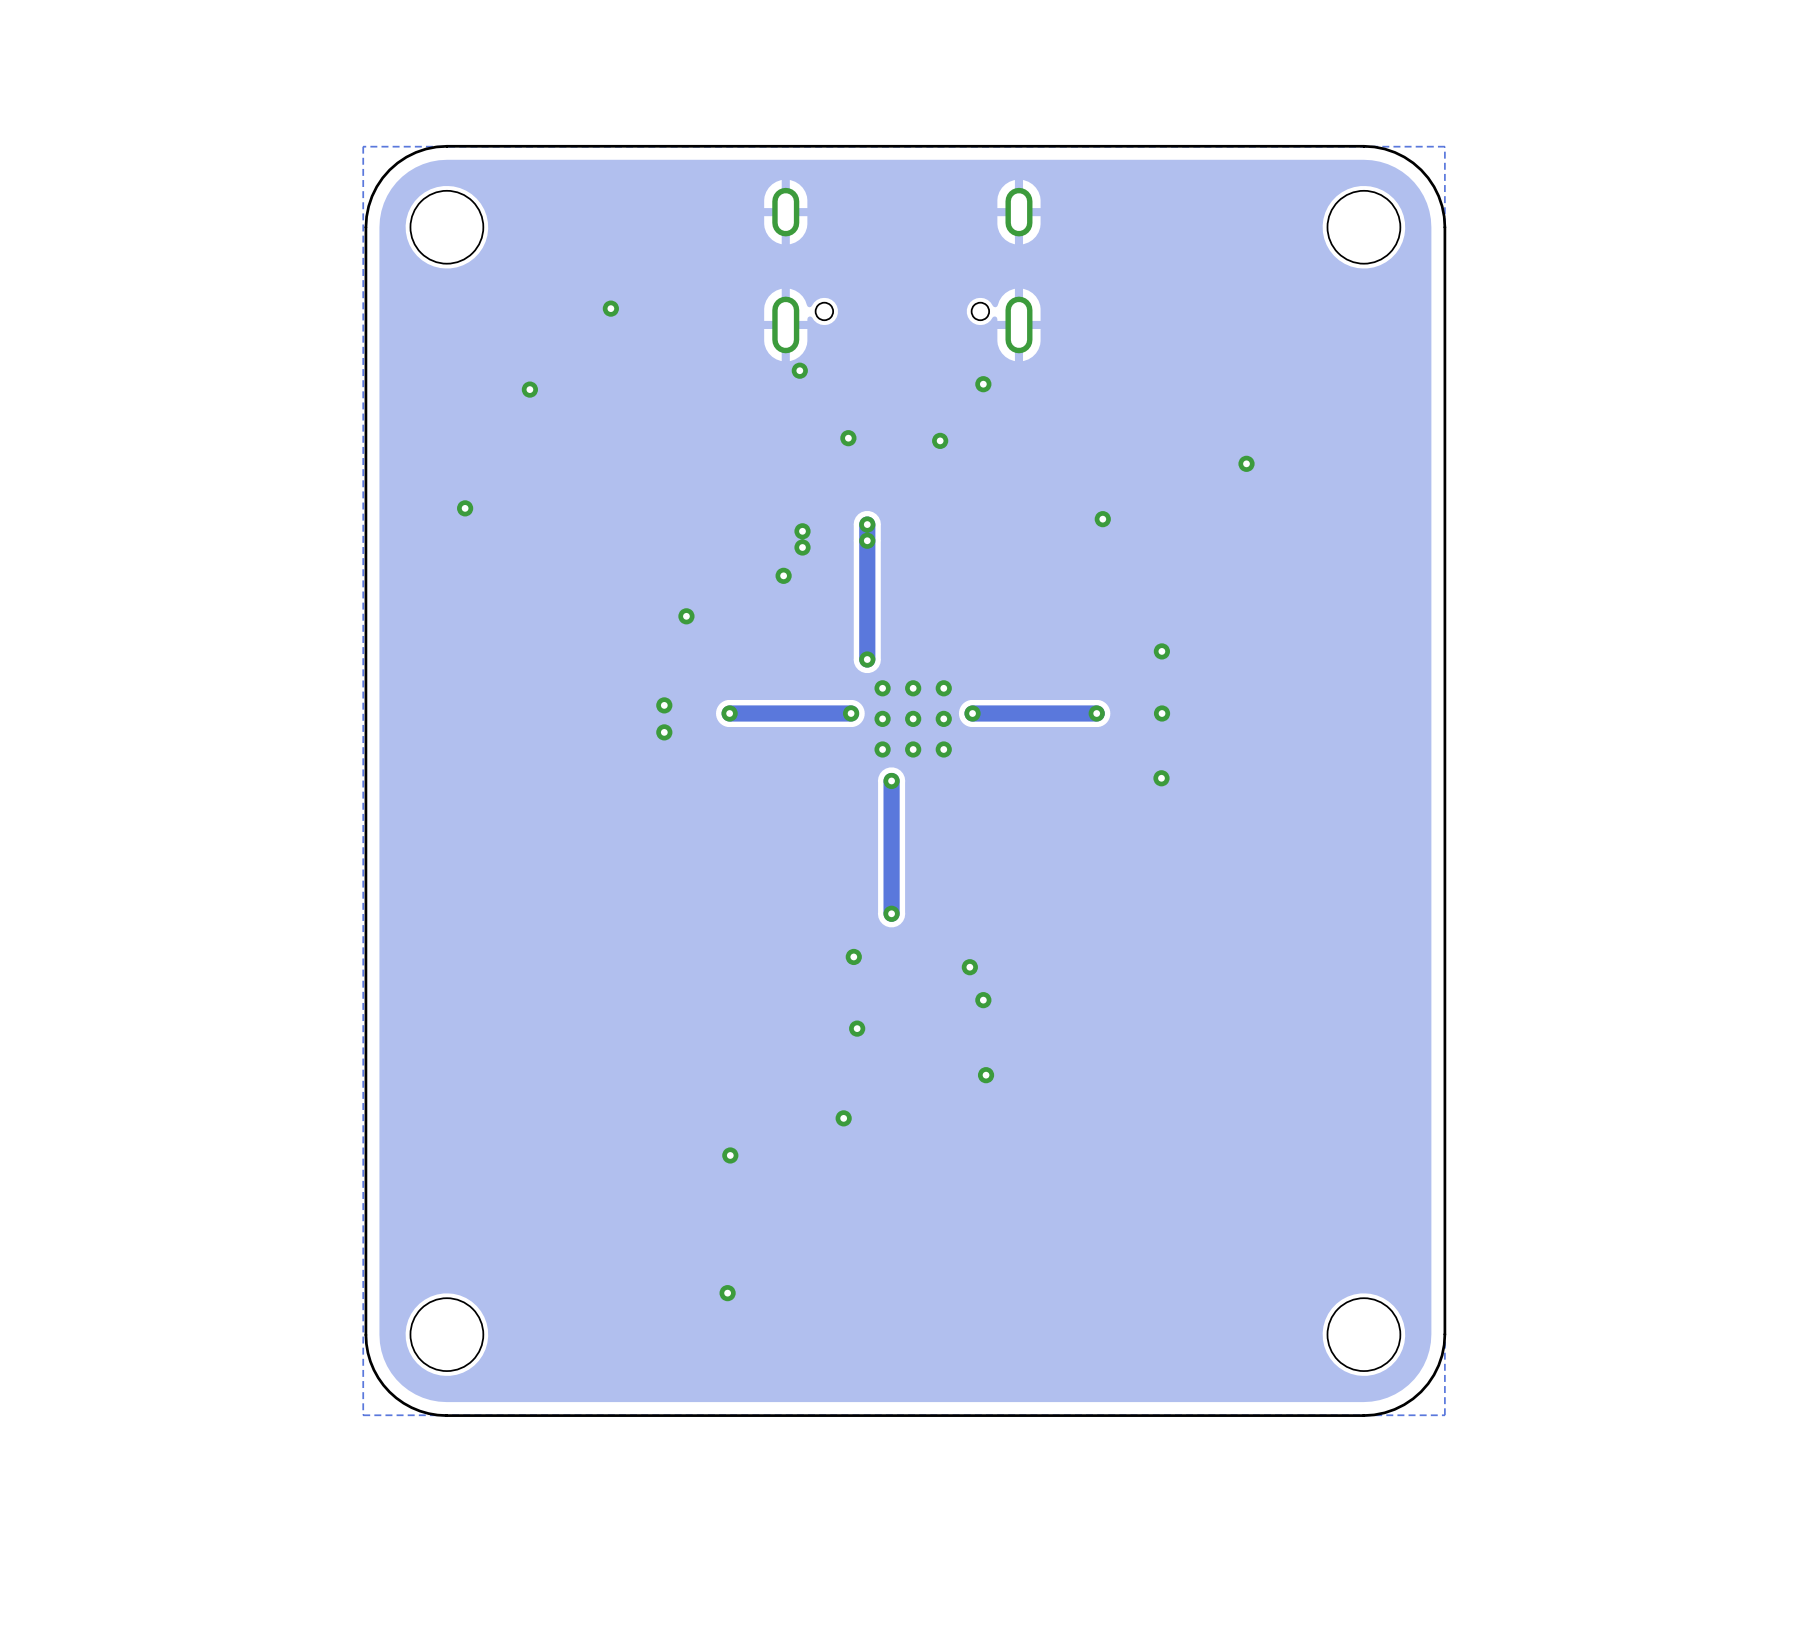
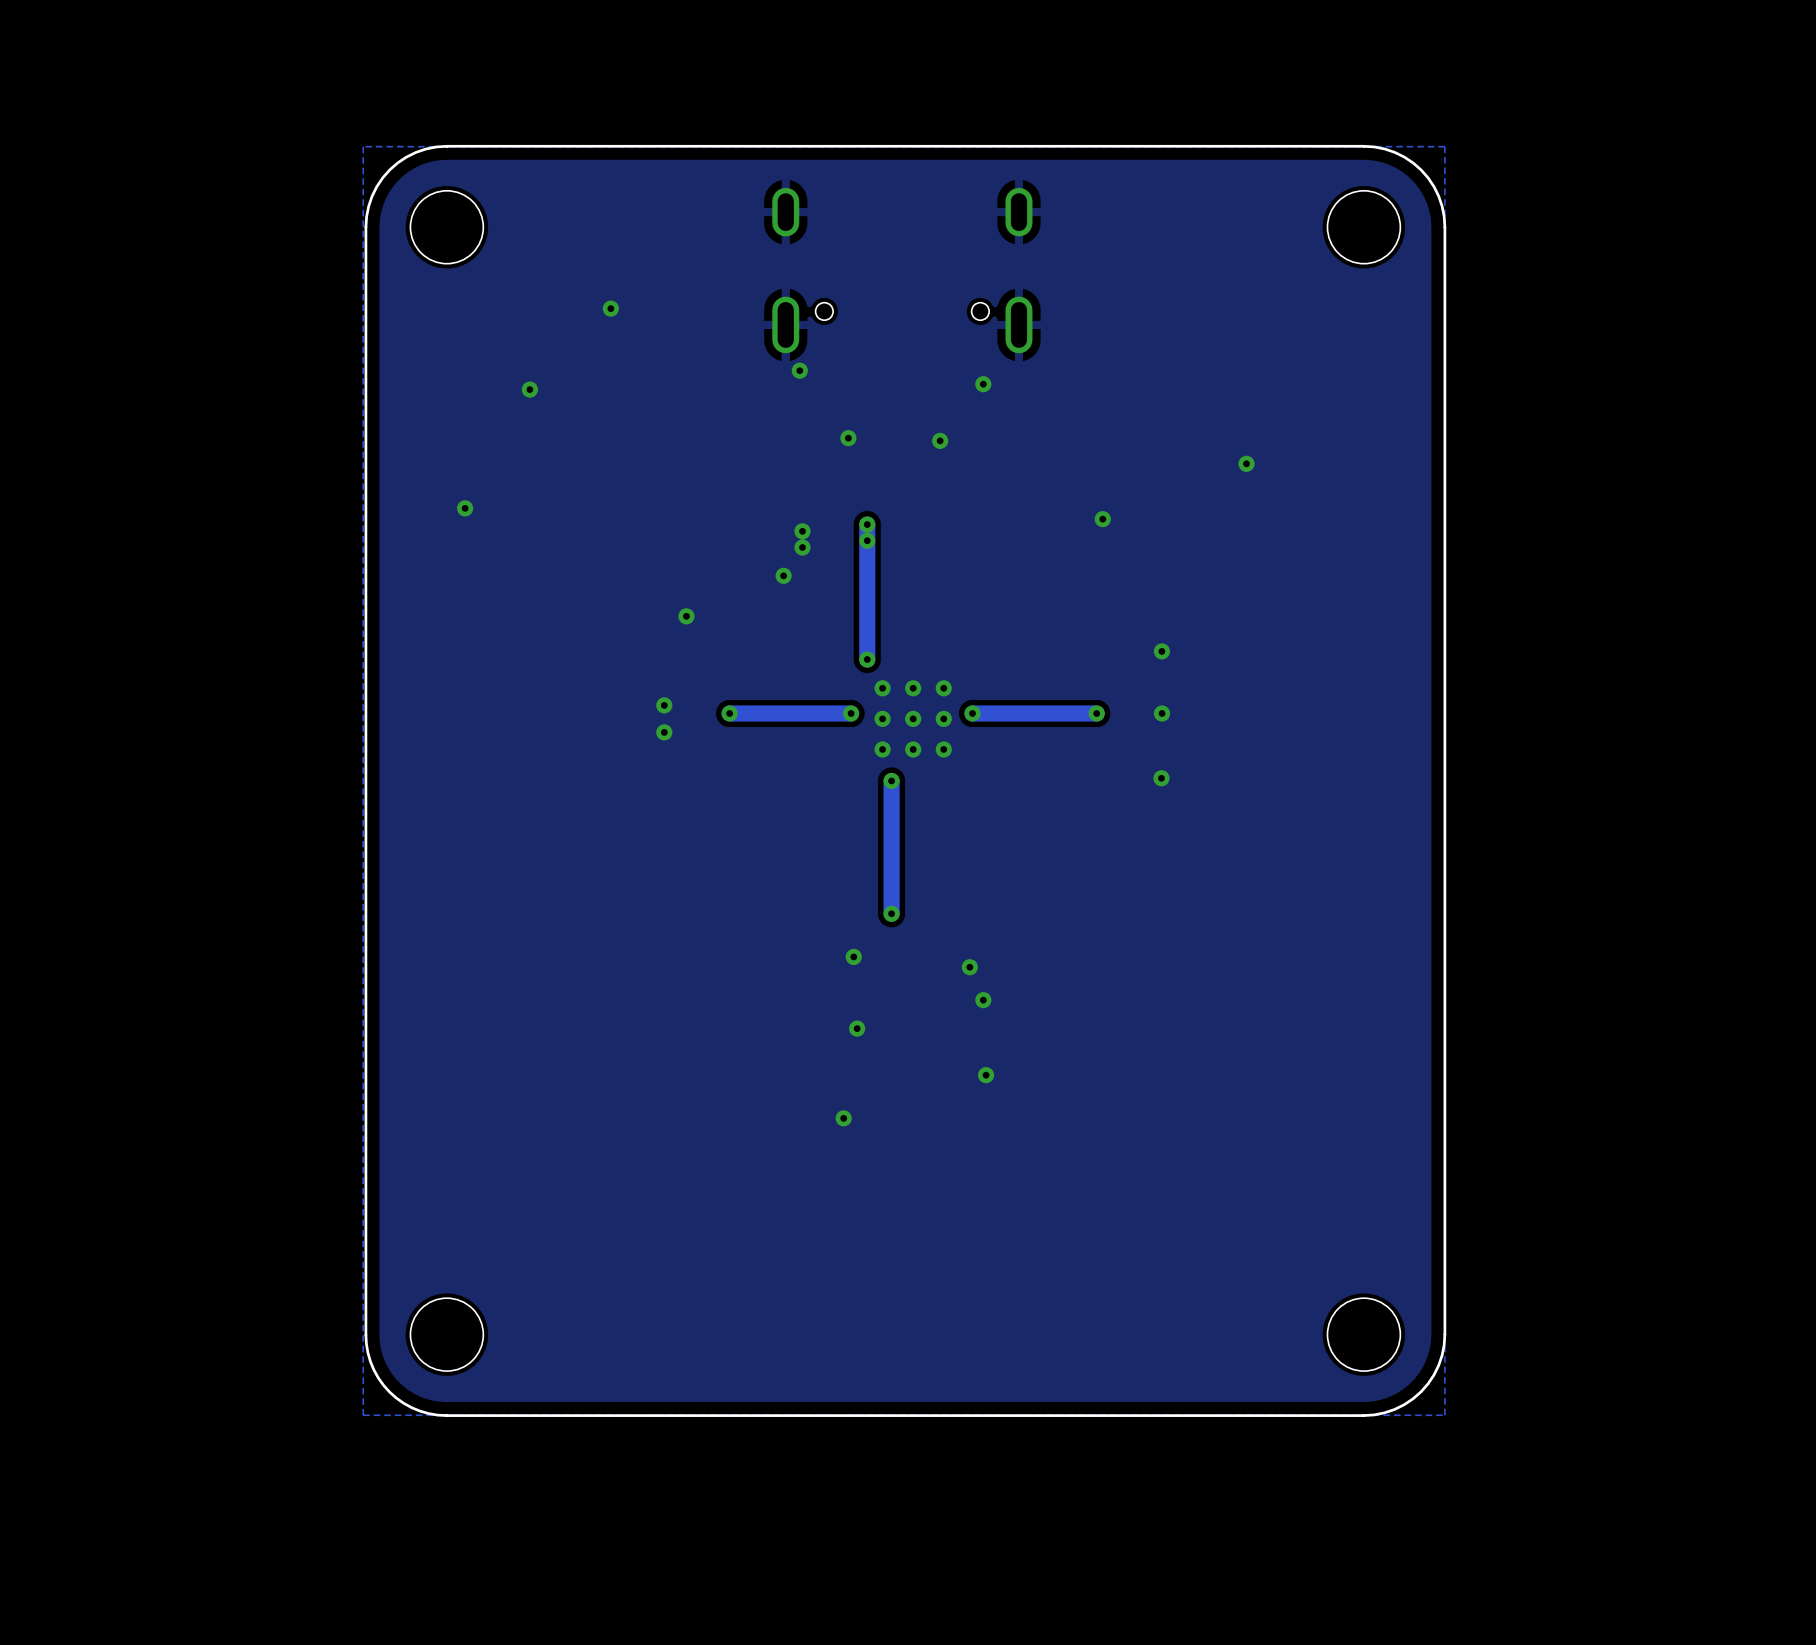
via: (730, 1155) -> none
via: (727, 1293) -> none

